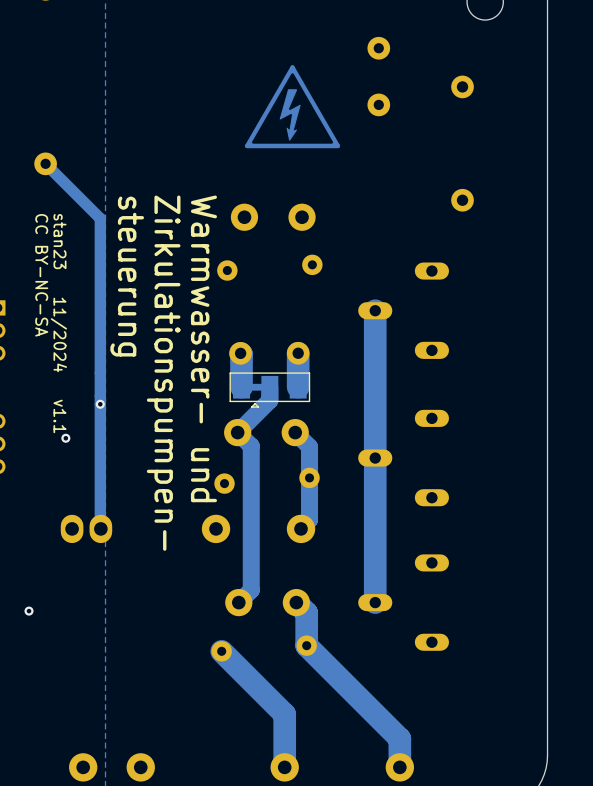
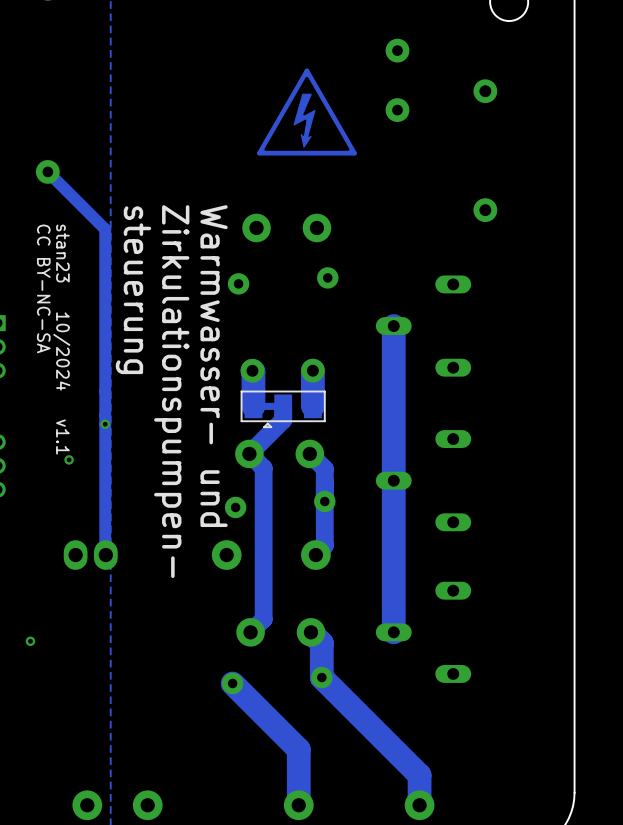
text: stan23 11/2024 v1.1 (58, 323) -> stan23 10/2024 v1.1 (61, 339)

